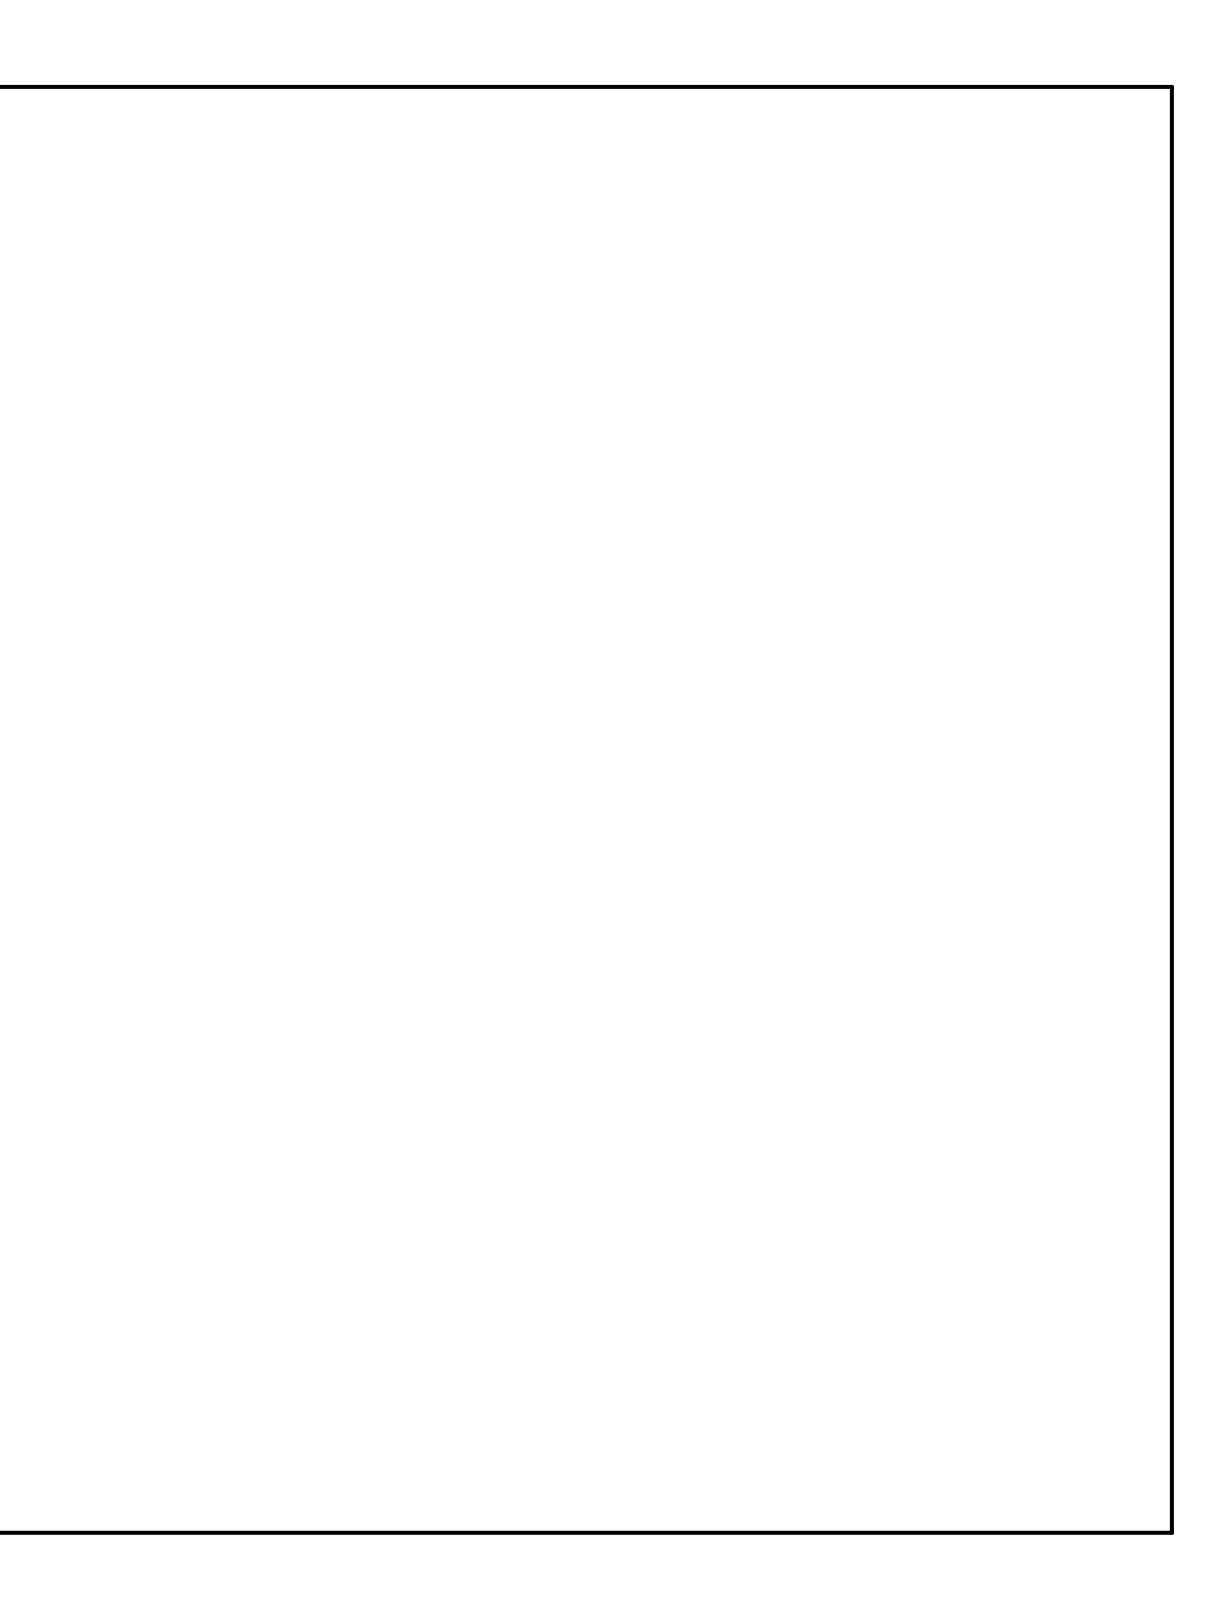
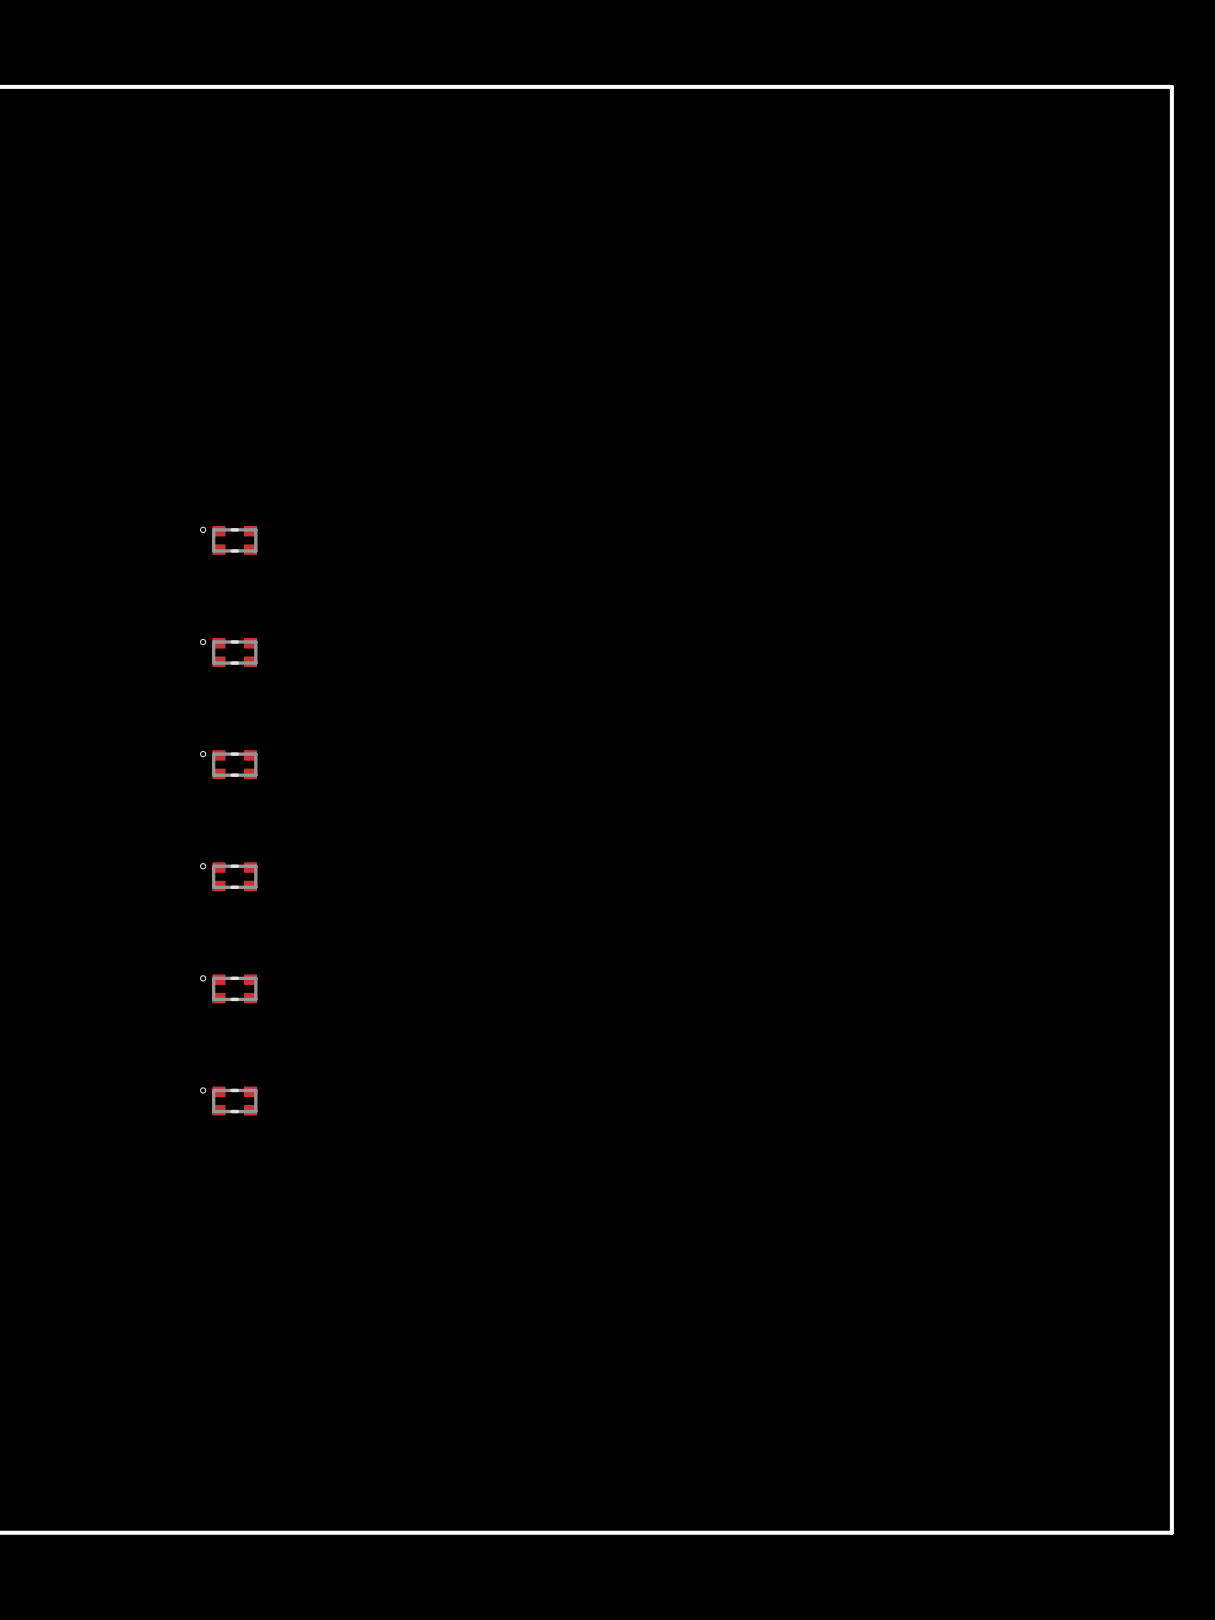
part: none -> (228, 540)
part: none -> (228, 652)
part: none -> (228, 764)
part: none -> (228, 876)
part: none -> (228, 988)
part: none -> (228, 1101)

